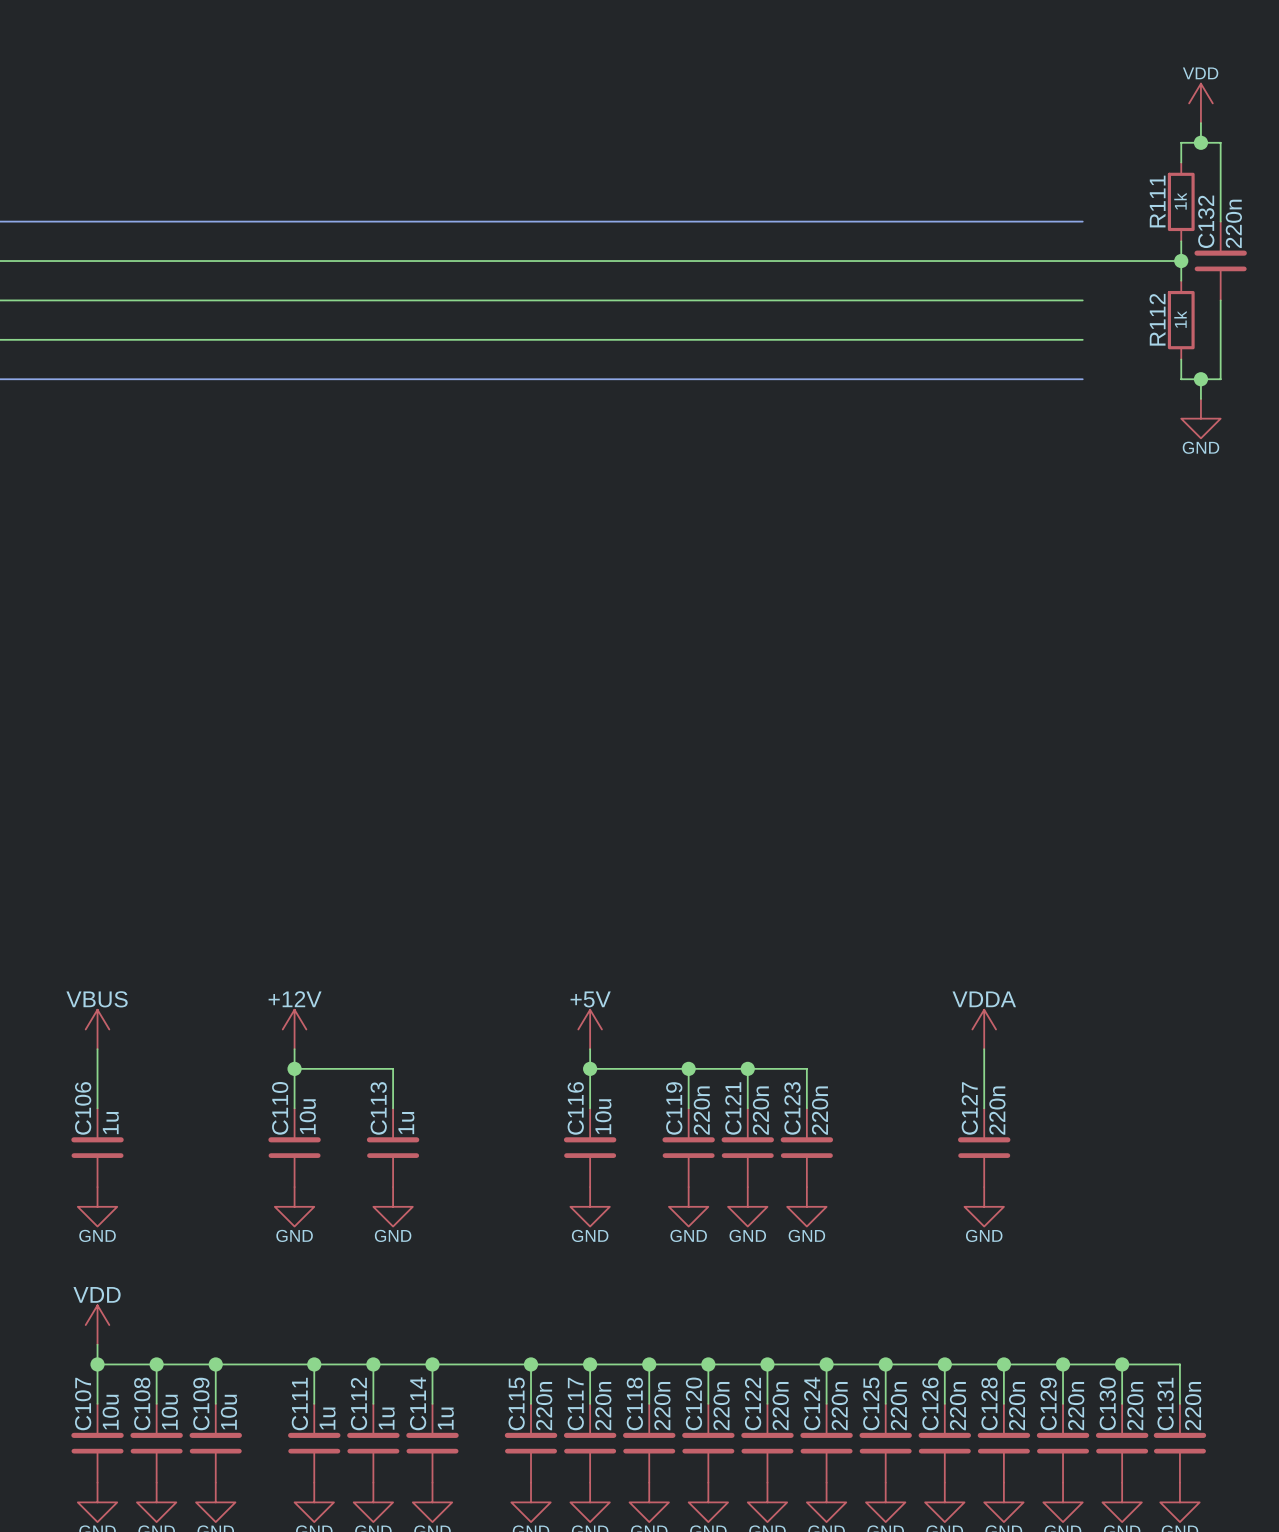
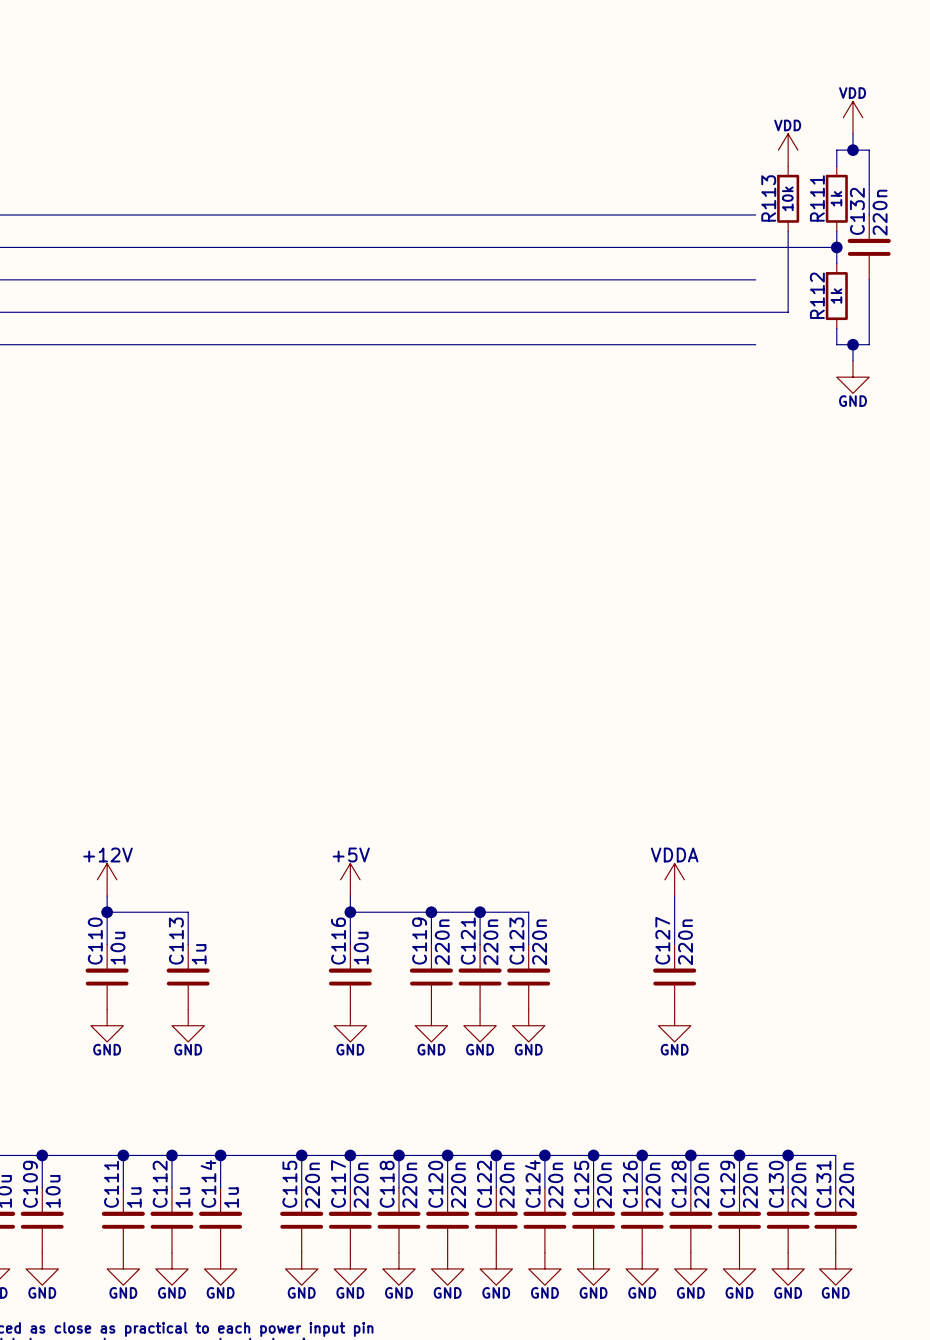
power symbol: none -> VDD (788, 150)
R113: none -> 10k (788, 198)
wire: none -> (788, 231) (788, 312) (755, 312)

